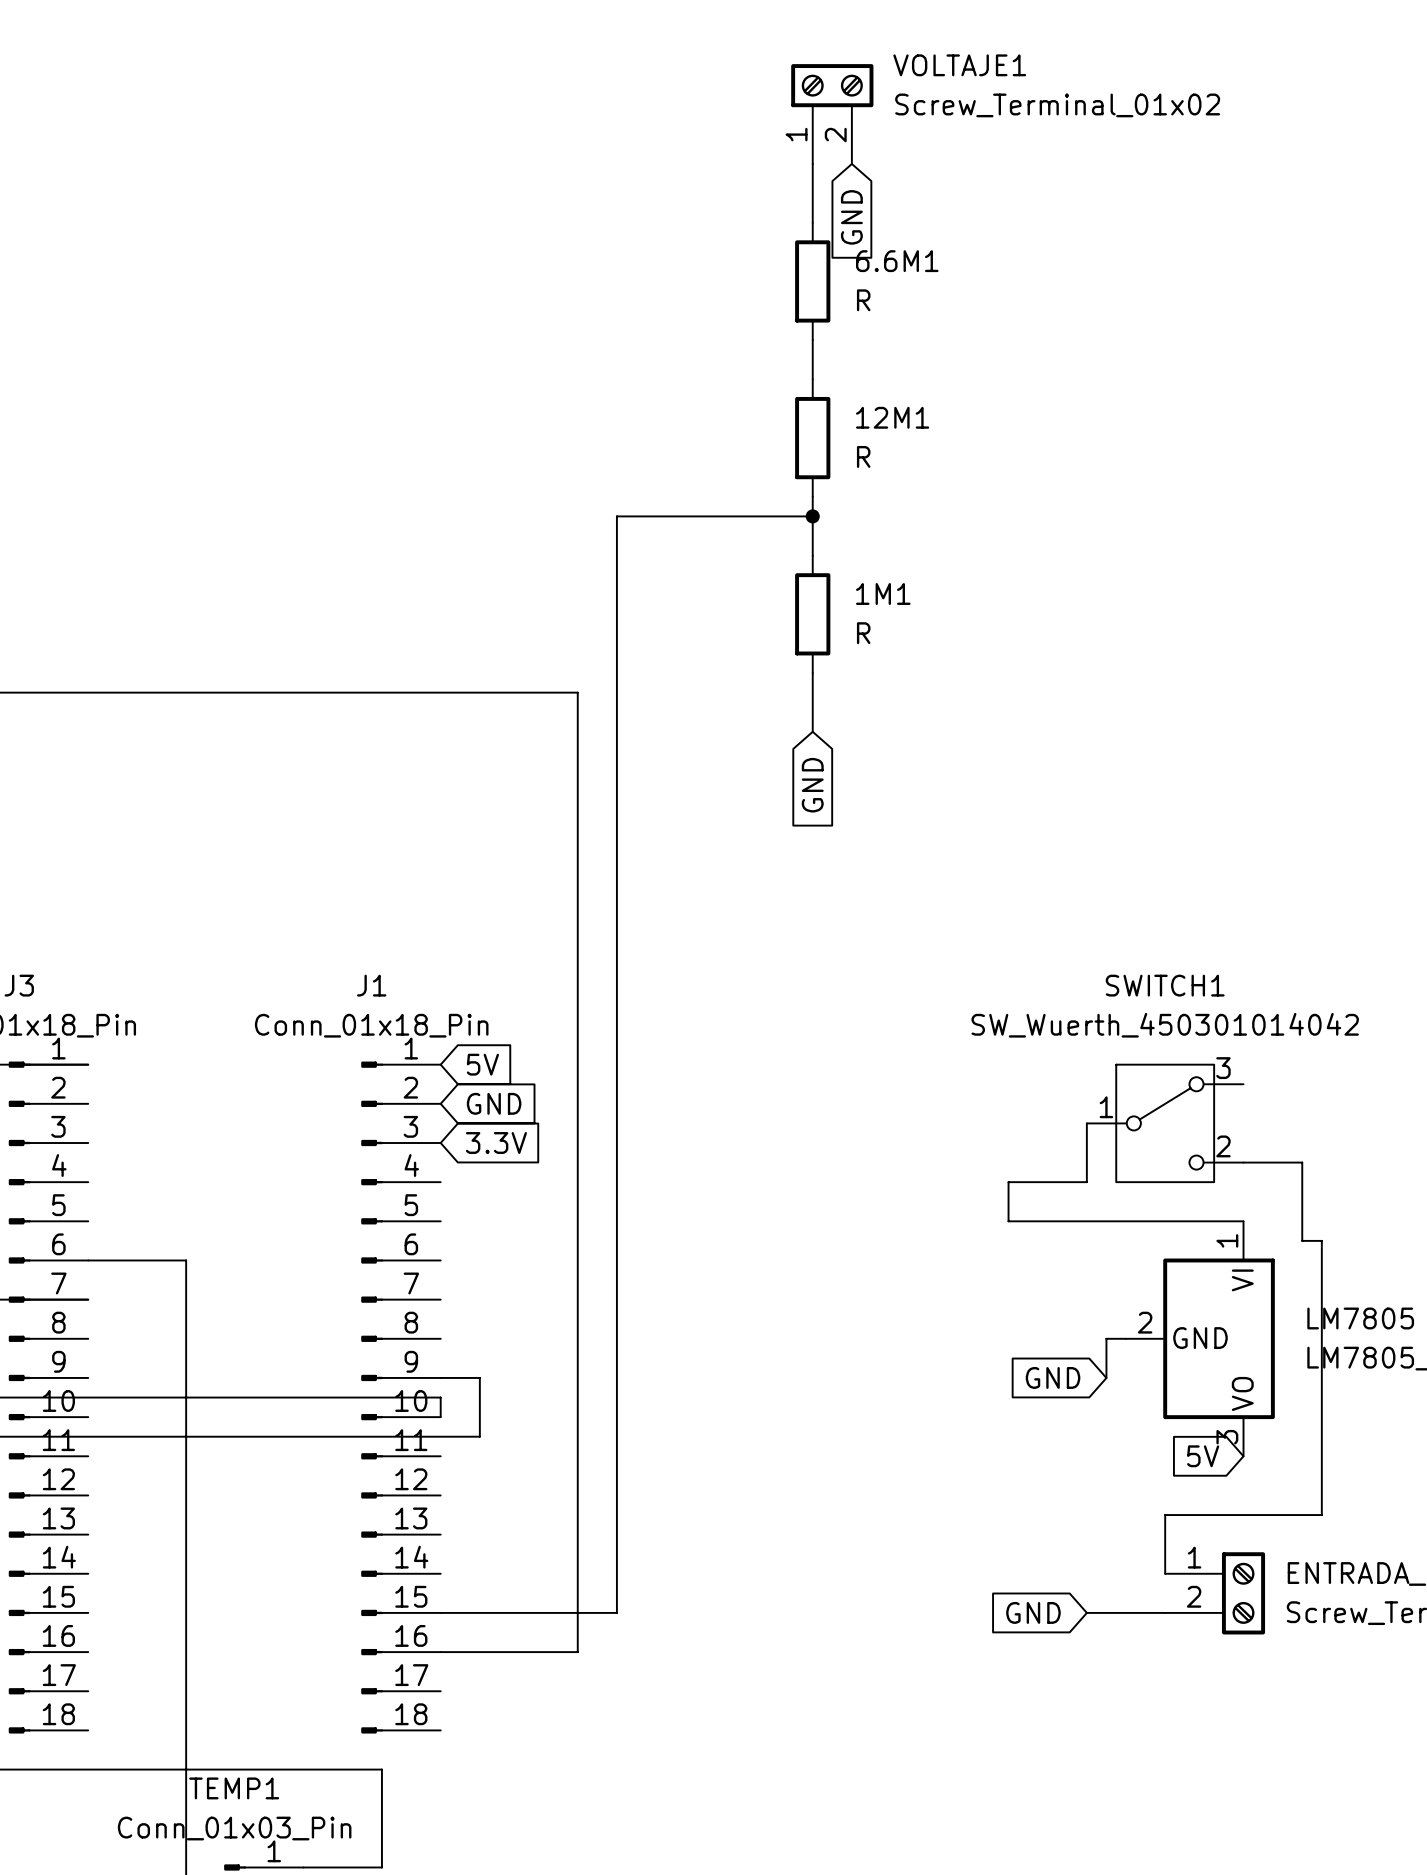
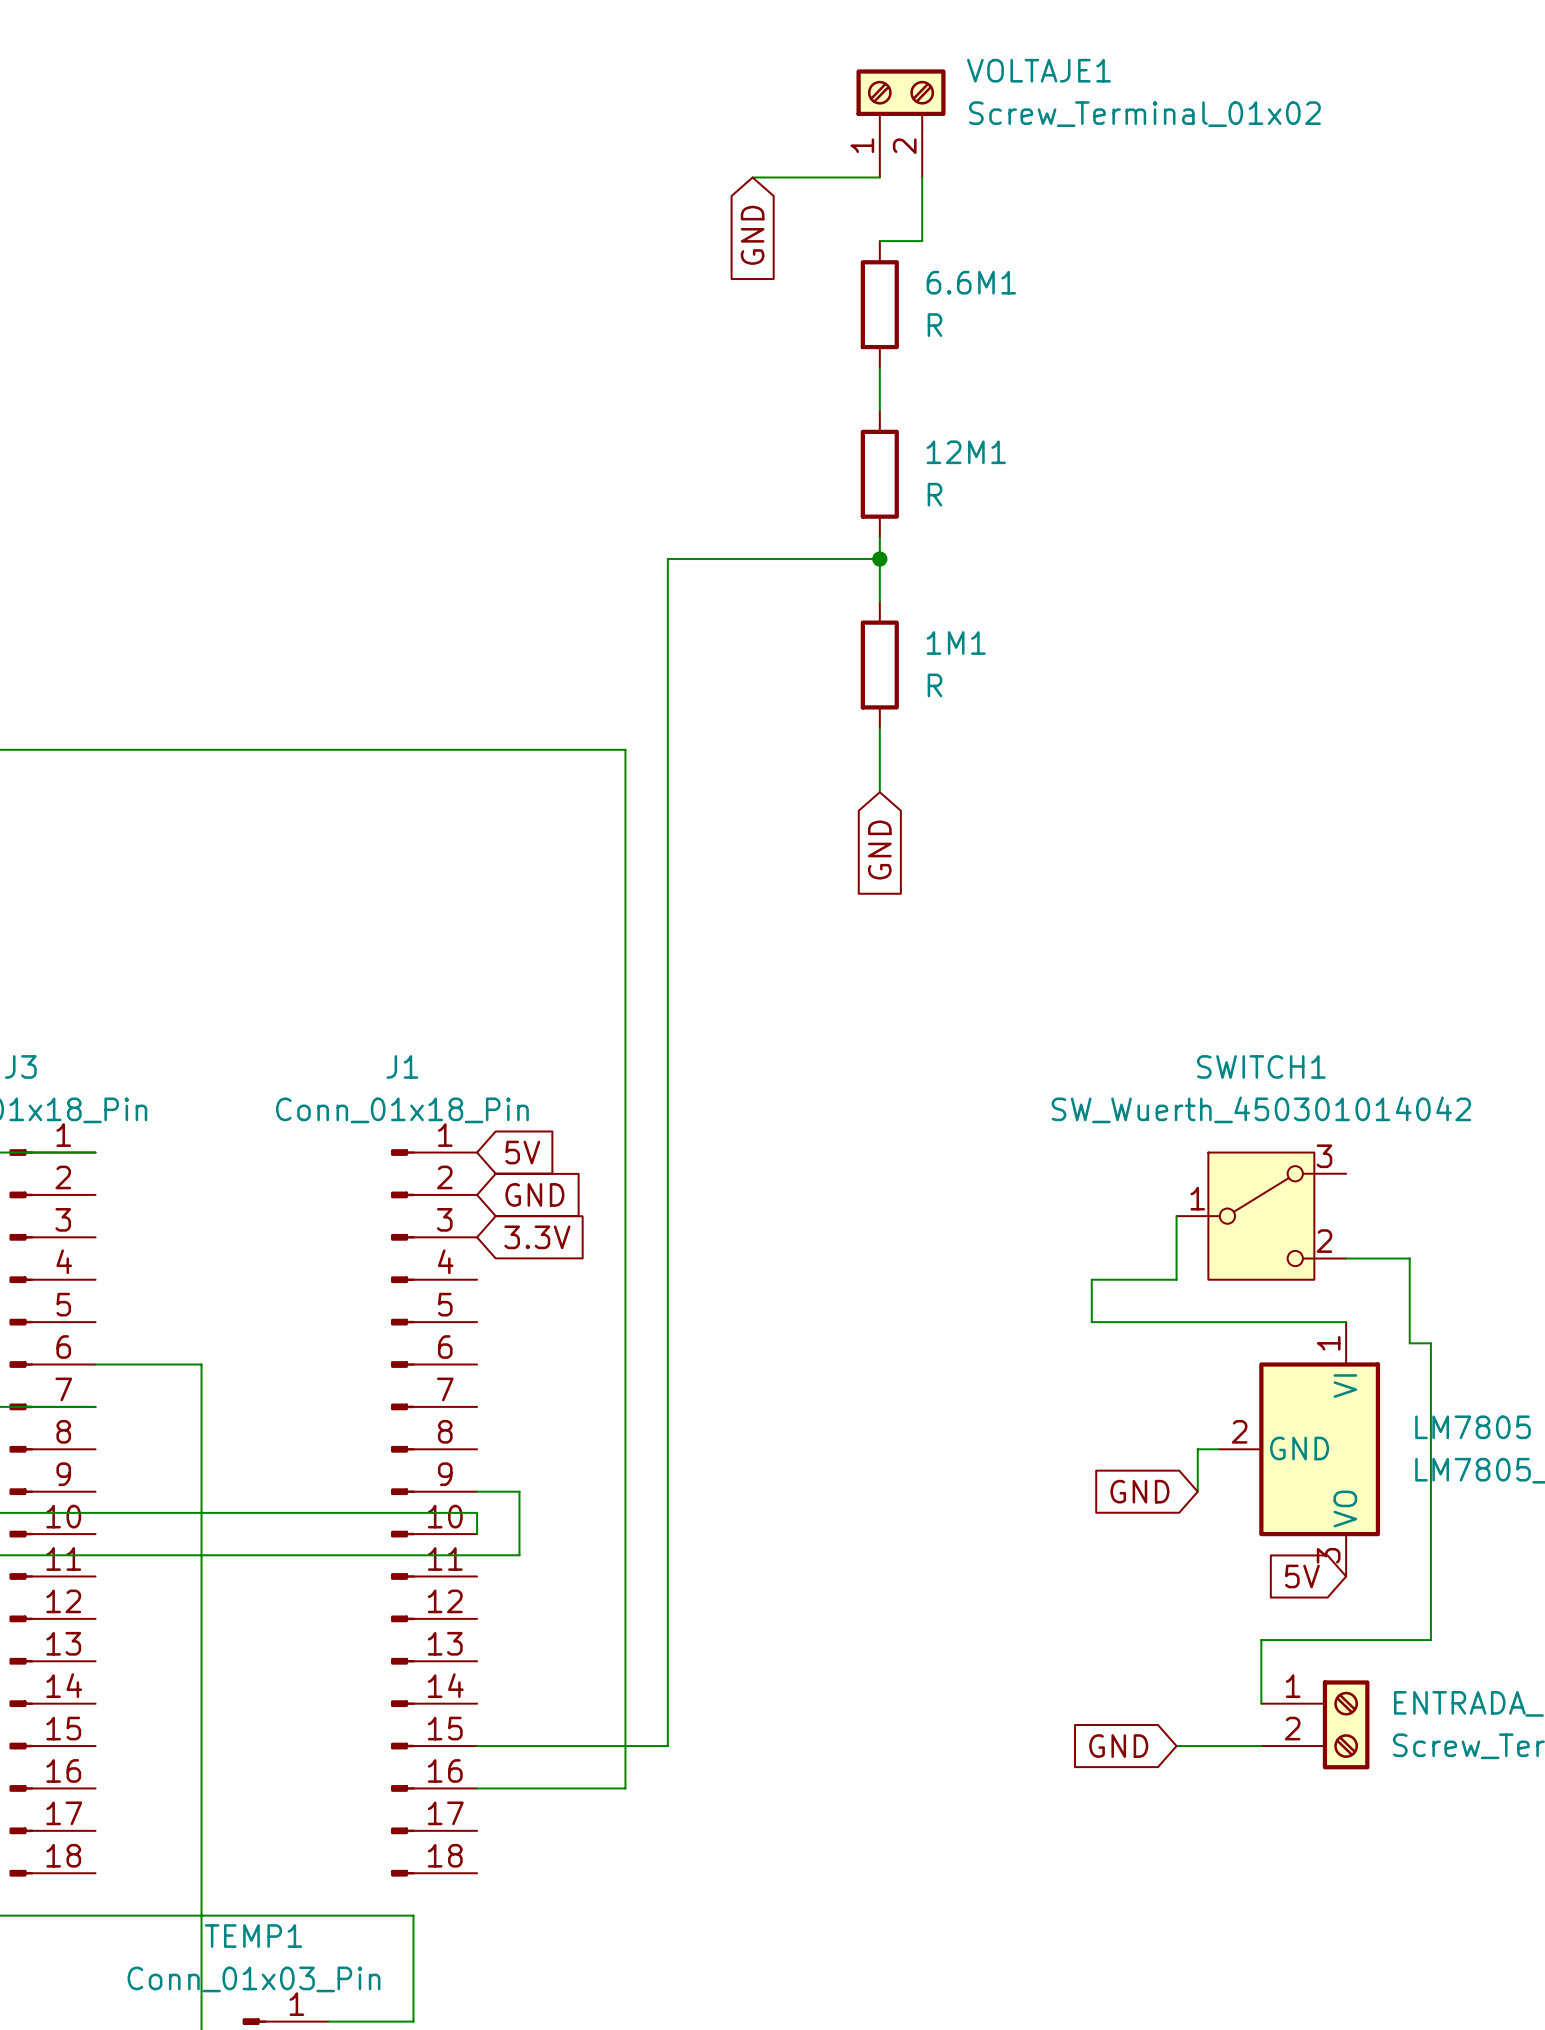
wire: none -> (752, 177) (879, 177)
wire: (812, 163) (812, 222) -> (922, 177) (922, 241) (879, 241)
global label position: GND (851, 217) -> GND (752, 235)

